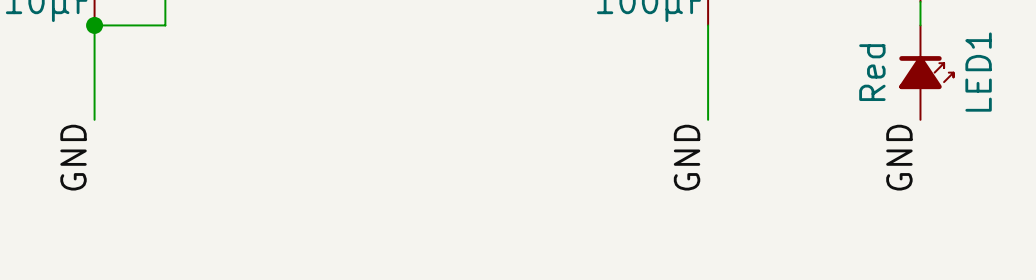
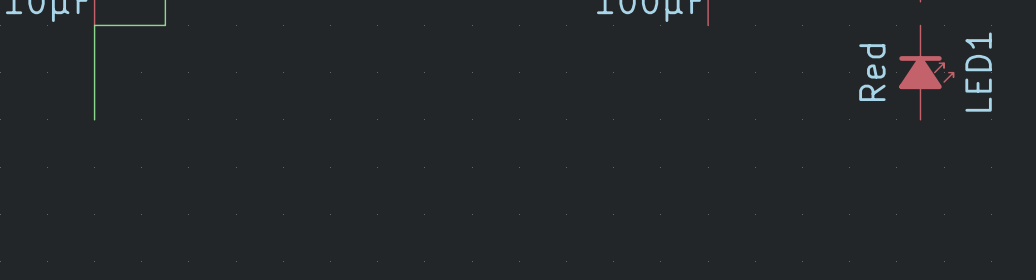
wire: (920, 1) (920, 25) -> none
junction: (94, 25) -> none
wire: (708, 25) (708, 119) -> none
label: GND (73, 157) -> none
label: GND (687, 157) -> none
label: GND (899, 157) -> none

